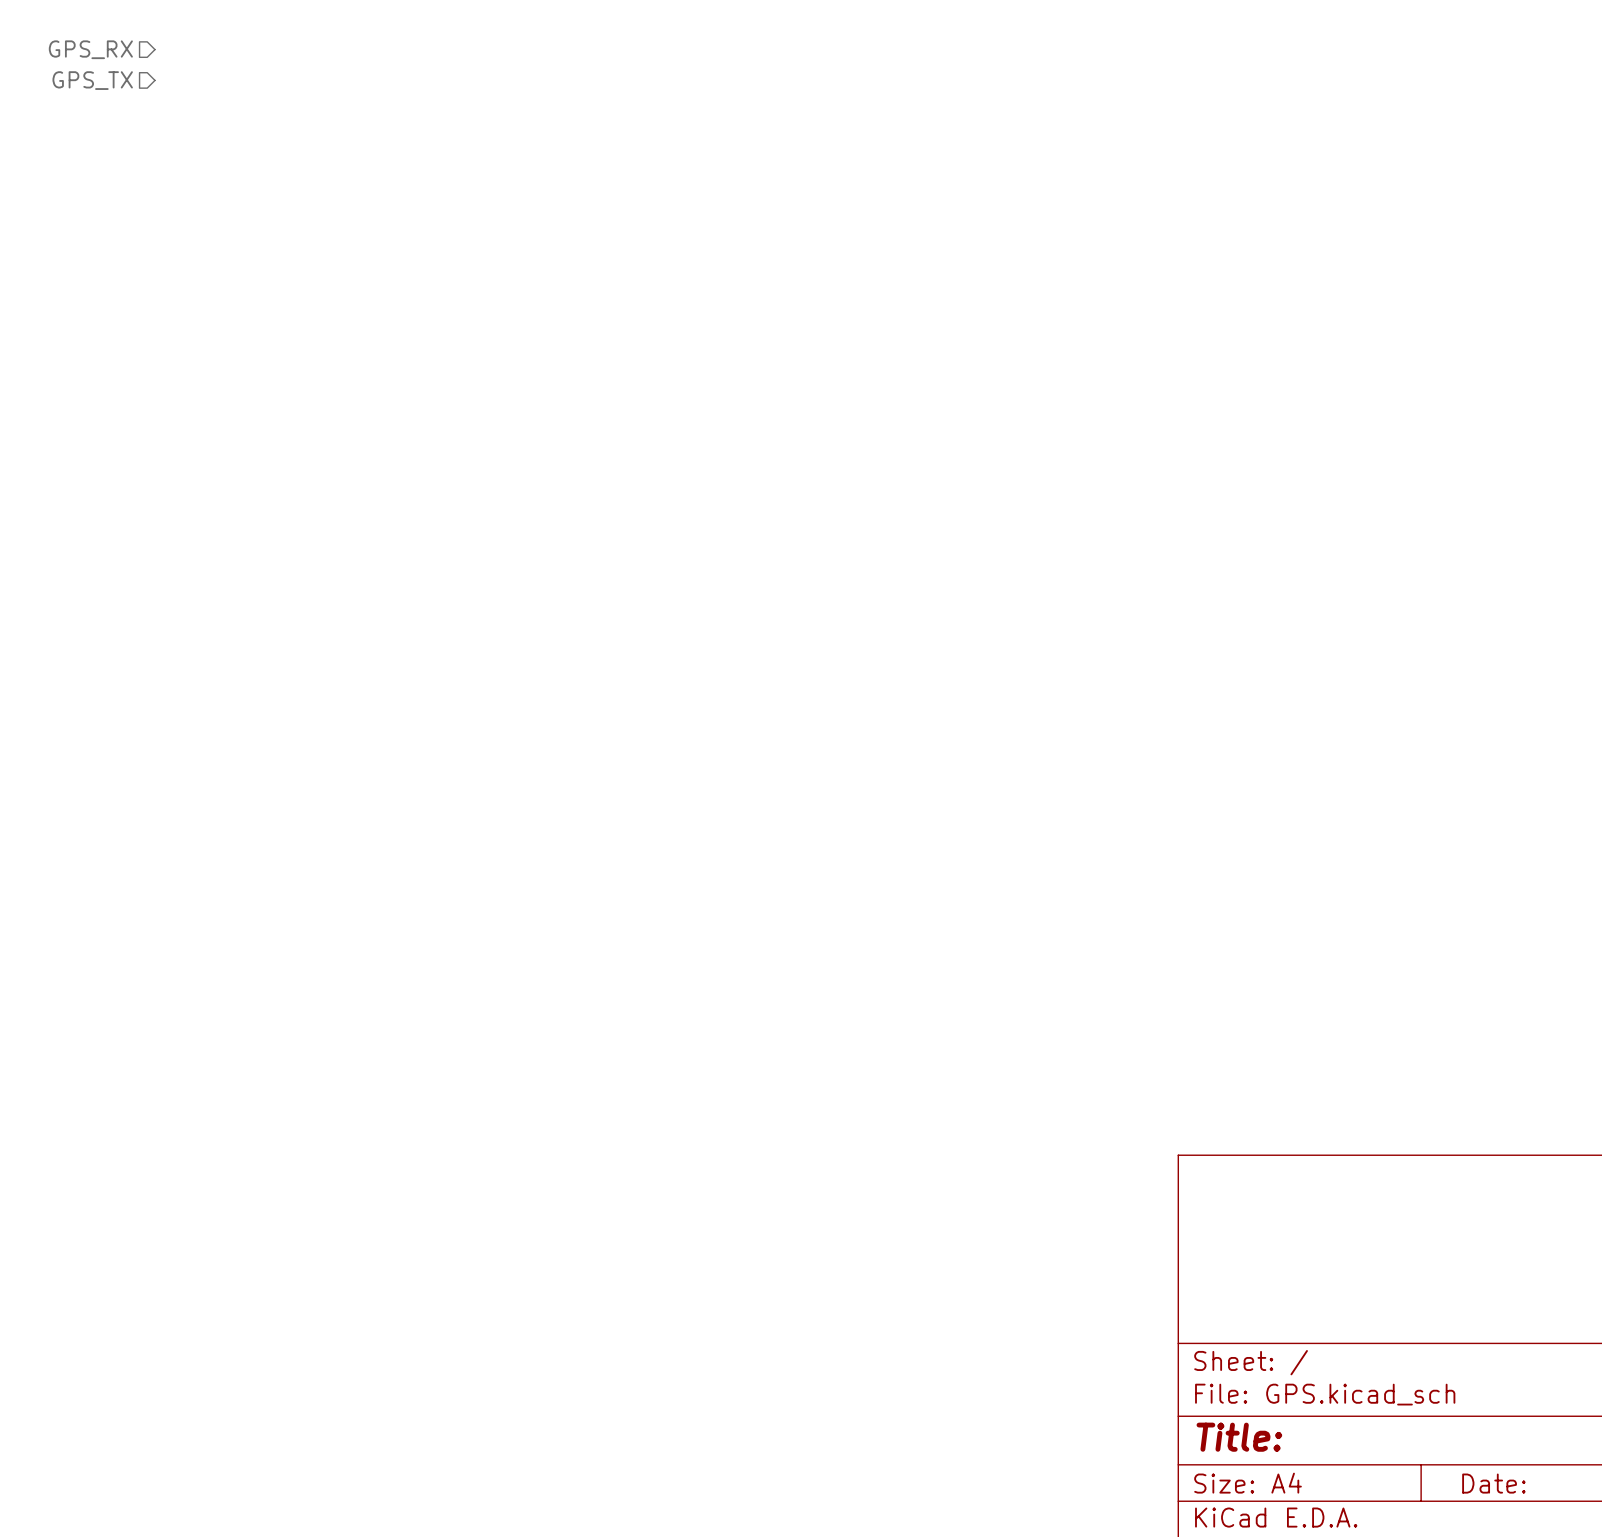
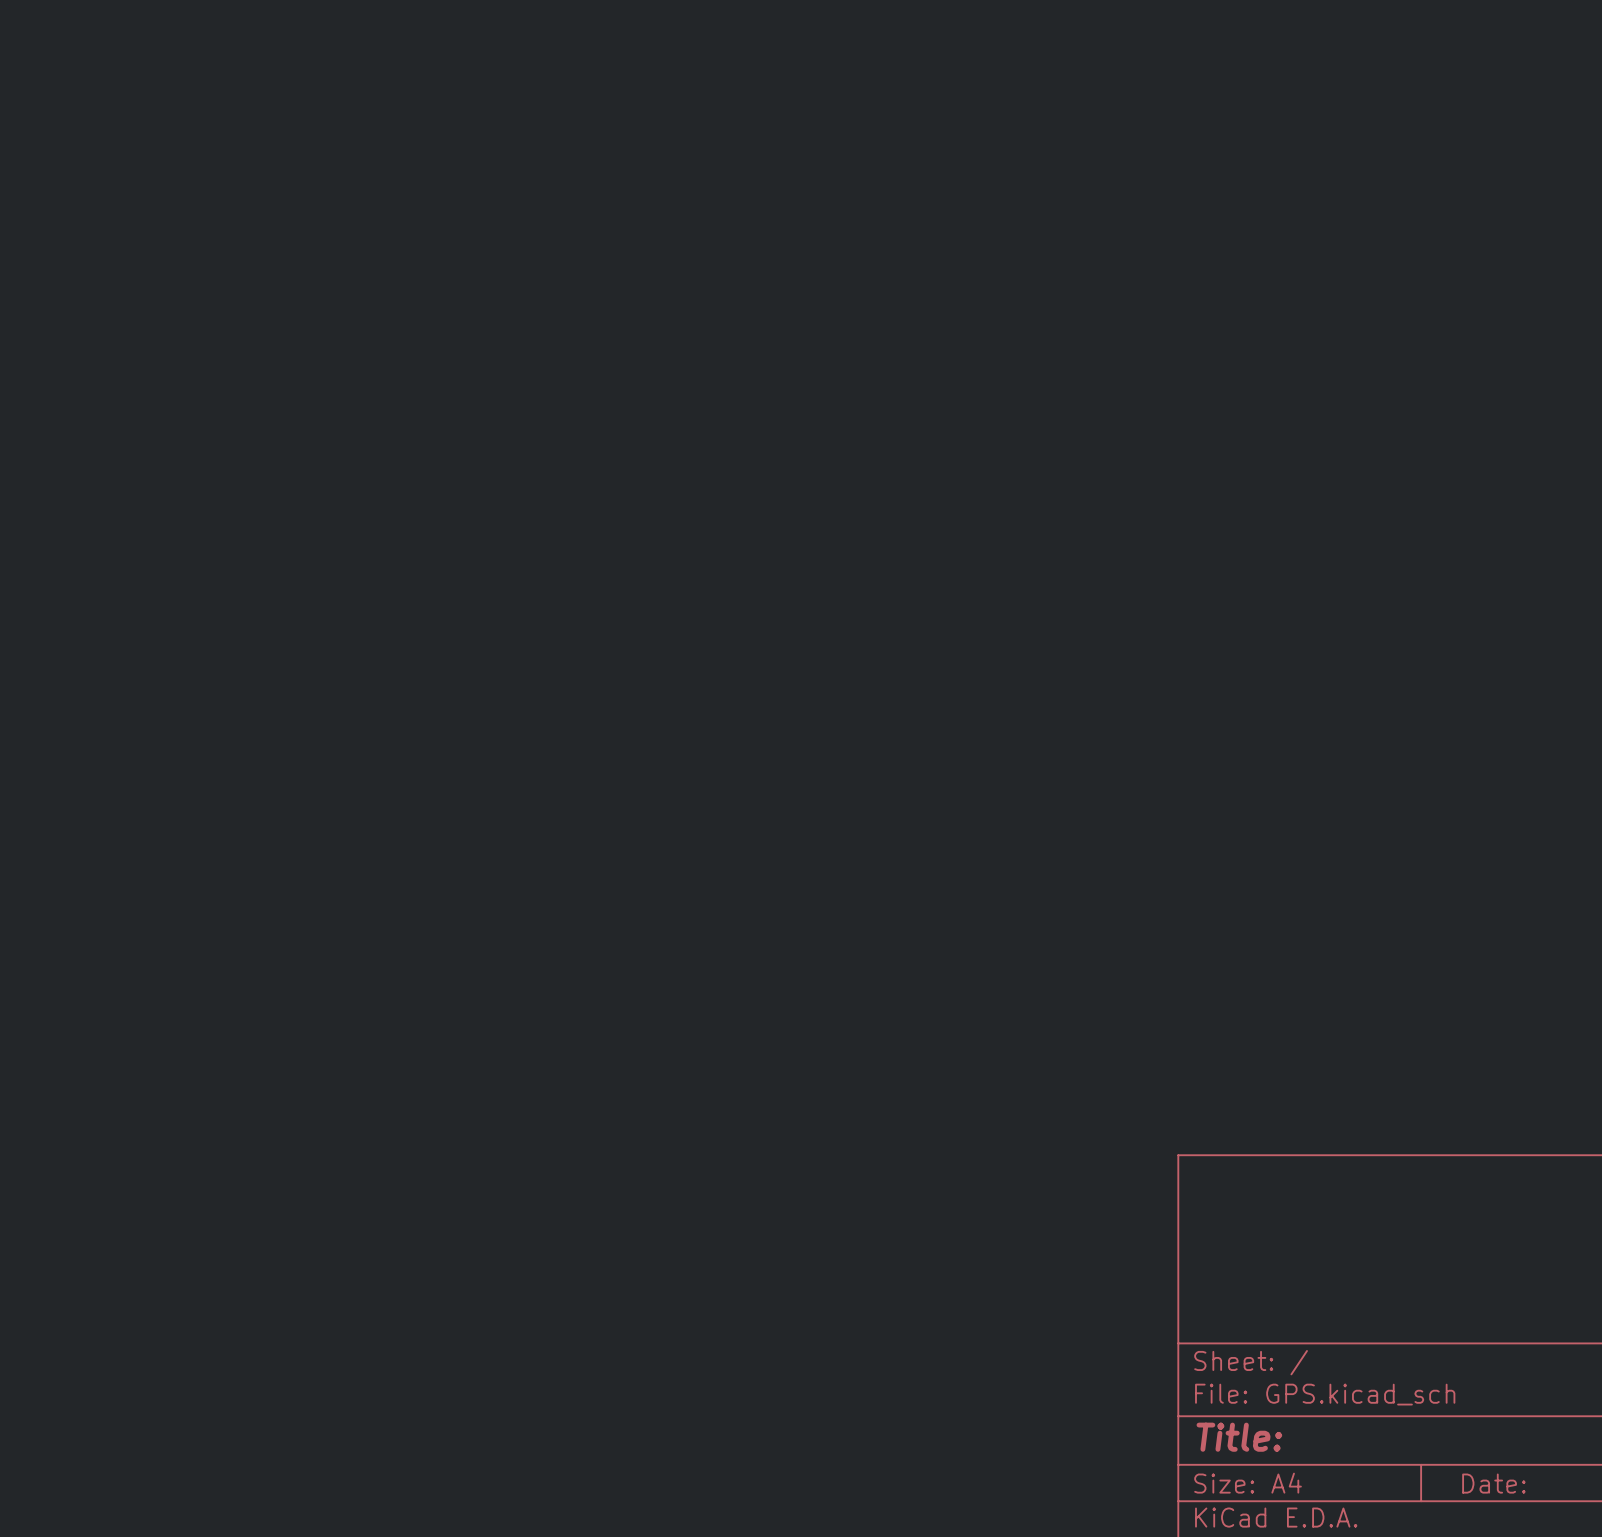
hierarchical label: GPS_RX (90, 49) -> none
hierarchical label: GPS_TX (92, 80) -> none

